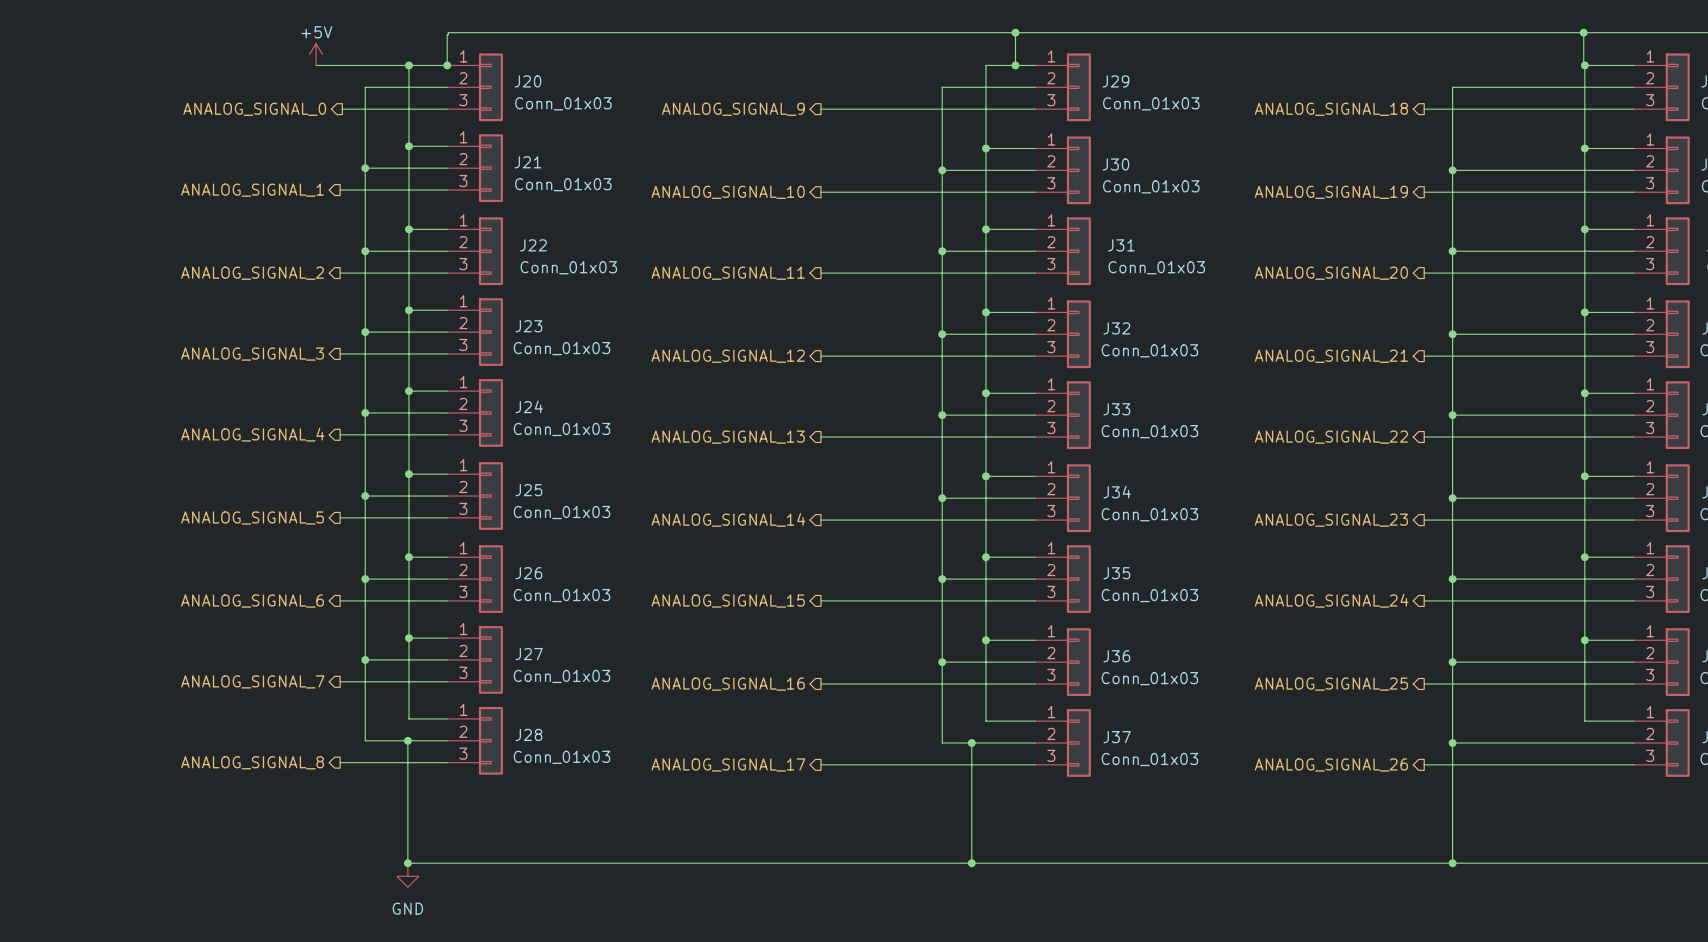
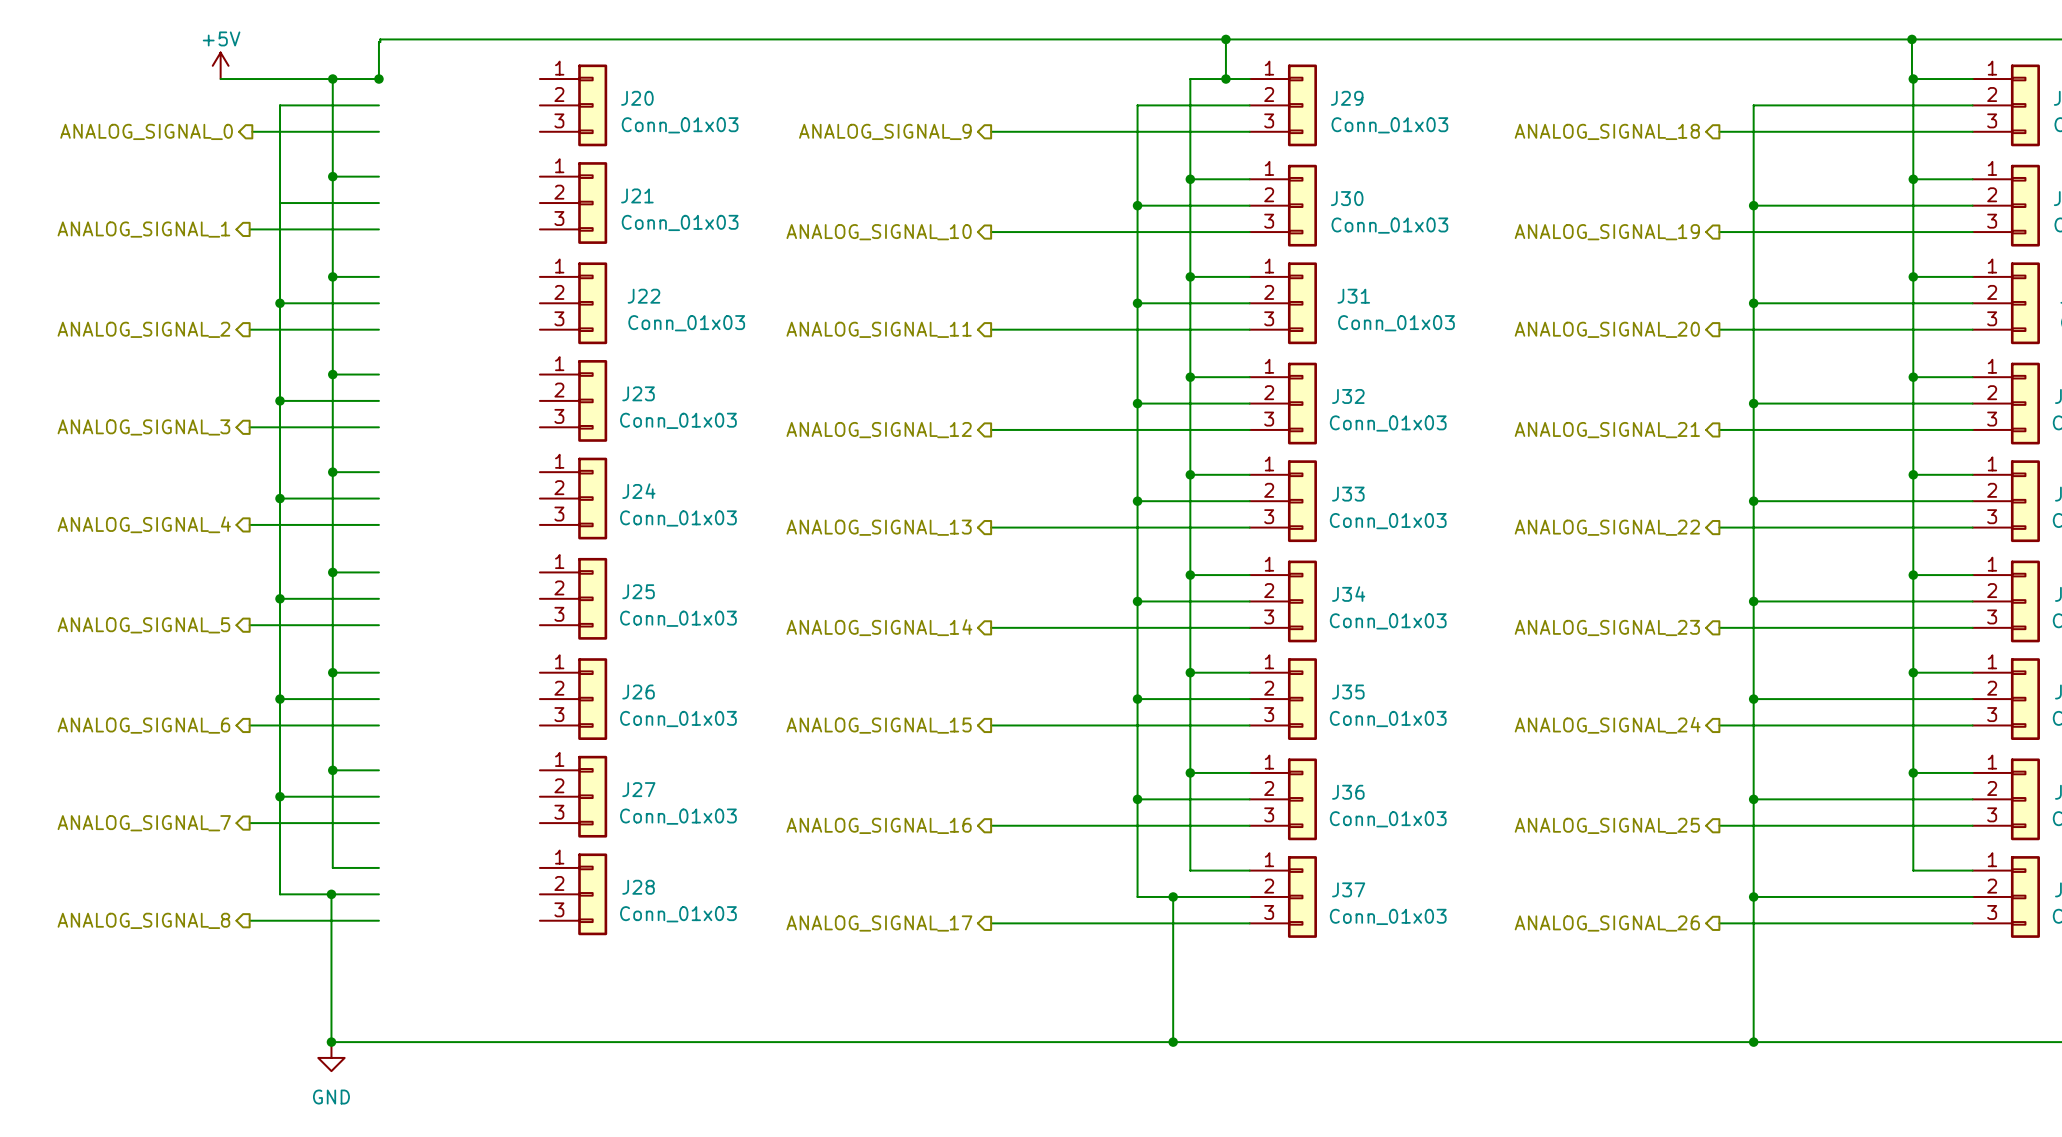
wire: (448, 32) (447, 65) (316, 65) -> (541, 39) (380, 39) (378, 79) (220, 79)
power symbol position: +5V (316, 54) -> +5V (220, 65)
junction: none -> (332, 79)
junction: none -> (378, 79)
wire: (408, 65) (408, 718) (447, 718) -> (332, 79) (332, 867) (378, 867)
junction: (408, 65) -> none
junction: (447, 65) -> none
wire: (447, 87) (365, 87) (365, 740) (447, 740) -> (378, 105) (280, 105) (280, 894) (378, 894)
hierarchical label position: ANALOG_SIGNAL_0 (254, 109) -> ANALOG_SIGNAL_0 (146, 131)
wire: (342, 109) (447, 109) -> (252, 131) (378, 131)
junction: none -> (332, 176)
wire: (408, 146) (447, 146) -> (332, 176) (378, 176)
junction: (408, 146) -> none
wire: (365, 168) (447, 168) -> (280, 203) (378, 203)
junction: (365, 168) -> none
hierarchical label position: ANALOG_SIGNAL_1 (252, 190) -> ANALOG_SIGNAL_1 (143, 229)
wire: (340, 190) (447, 190) -> (249, 229) (378, 229)
junction: none -> (332, 276)
wire: (408, 229) (447, 229) -> (332, 276) (378, 276)
junction: (408, 229) -> none
junction: none -> (280, 303)
wire: (365, 251) (447, 251) -> (280, 303) (378, 303)
junction: (365, 251) -> none
hierarchical label position: ANALOG_SIGNAL_2 (252, 273) -> ANALOG_SIGNAL_2 (143, 329)
wire: (340, 273) (447, 273) -> (249, 329) (378, 329)
junction: none -> (332, 374)
wire: (408, 310) (447, 310) -> (332, 374) (378, 374)
junction: (408, 310) -> none
junction: none -> (280, 400)
wire: (365, 332) (447, 332) -> (280, 400) (378, 400)
junction: (365, 332) -> none
wire: (340, 353) (447, 353) -> (249, 427) (378, 427)
hierarchical label position: ANALOG_SIGNAL_3 (252, 354) -> ANALOG_SIGNAL_3 (143, 427)
junction: none -> (332, 472)
wire: (408, 391) (447, 391) -> (332, 472) (378, 472)
junction: (408, 391) -> none
junction: none -> (280, 498)
wire: (365, 412) (447, 412) -> (280, 498) (378, 498)
junction: (365, 412) -> none
hierarchical label position: ANALOG_SIGNAL_4 (252, 434) -> ANALOG_SIGNAL_4 (144, 524)
wire: (340, 434) (447, 434) -> (249, 524) (378, 524)
junction: none -> (332, 572)
wire: (408, 474) (447, 474) -> (332, 572) (378, 572)
junction: (408, 474) -> none
junction: none -> (280, 598)
wire: (365, 496) (447, 496) -> (280, 598) (378, 598)
junction: (365, 496) -> none
hierarchical label position: ANALOG_SIGNAL_5 (252, 517) -> ANALOG_SIGNAL_5 (143, 625)
wire: (340, 517) (447, 517) -> (249, 625) (378, 625)
junction: none -> (332, 672)
wire: (408, 557) (447, 557) -> (332, 672) (378, 672)
junction: (408, 557) -> none
junction: none -> (280, 699)
wire: (365, 579) (447, 579) -> (280, 699) (378, 699)
junction: (365, 579) -> none
wire: (340, 600) (447, 600) -> (249, 725) (378, 725)
hierarchical label position: ANALOG_SIGNAL_6 (252, 601) -> ANALOG_SIGNAL_6 (143, 725)
junction: none -> (332, 770)
wire: (408, 638) (447, 638) -> (332, 770) (378, 770)
junction: (408, 638) -> none
junction: none -> (280, 796)
wire: (365, 659) (447, 659) -> (280, 796) (378, 796)
junction: (365, 659) -> none
hierarchical label position: ANALOG_SIGNAL_7 (252, 681) -> ANALOG_SIGNAL_7 (144, 823)
wire: (340, 681) (447, 681) -> (249, 823) (378, 823)
junction: none -> (331, 894)
wire: (407, 740) (407, 865) -> (331, 894) (331, 1044)
junction: (407, 740) -> none
hierarchical label position: ANALOG_SIGNAL_8 (252, 762) -> ANALOG_SIGNAL_8 (143, 920)
wire: (340, 762) (447, 762) -> (249, 920) (378, 920)
wire: none -> (331, 1042) (492, 1042)
junction: none -> (331, 1042)
junction: (407, 863) -> none
power symbol position: GND (407, 876) -> GND (331, 1057)

